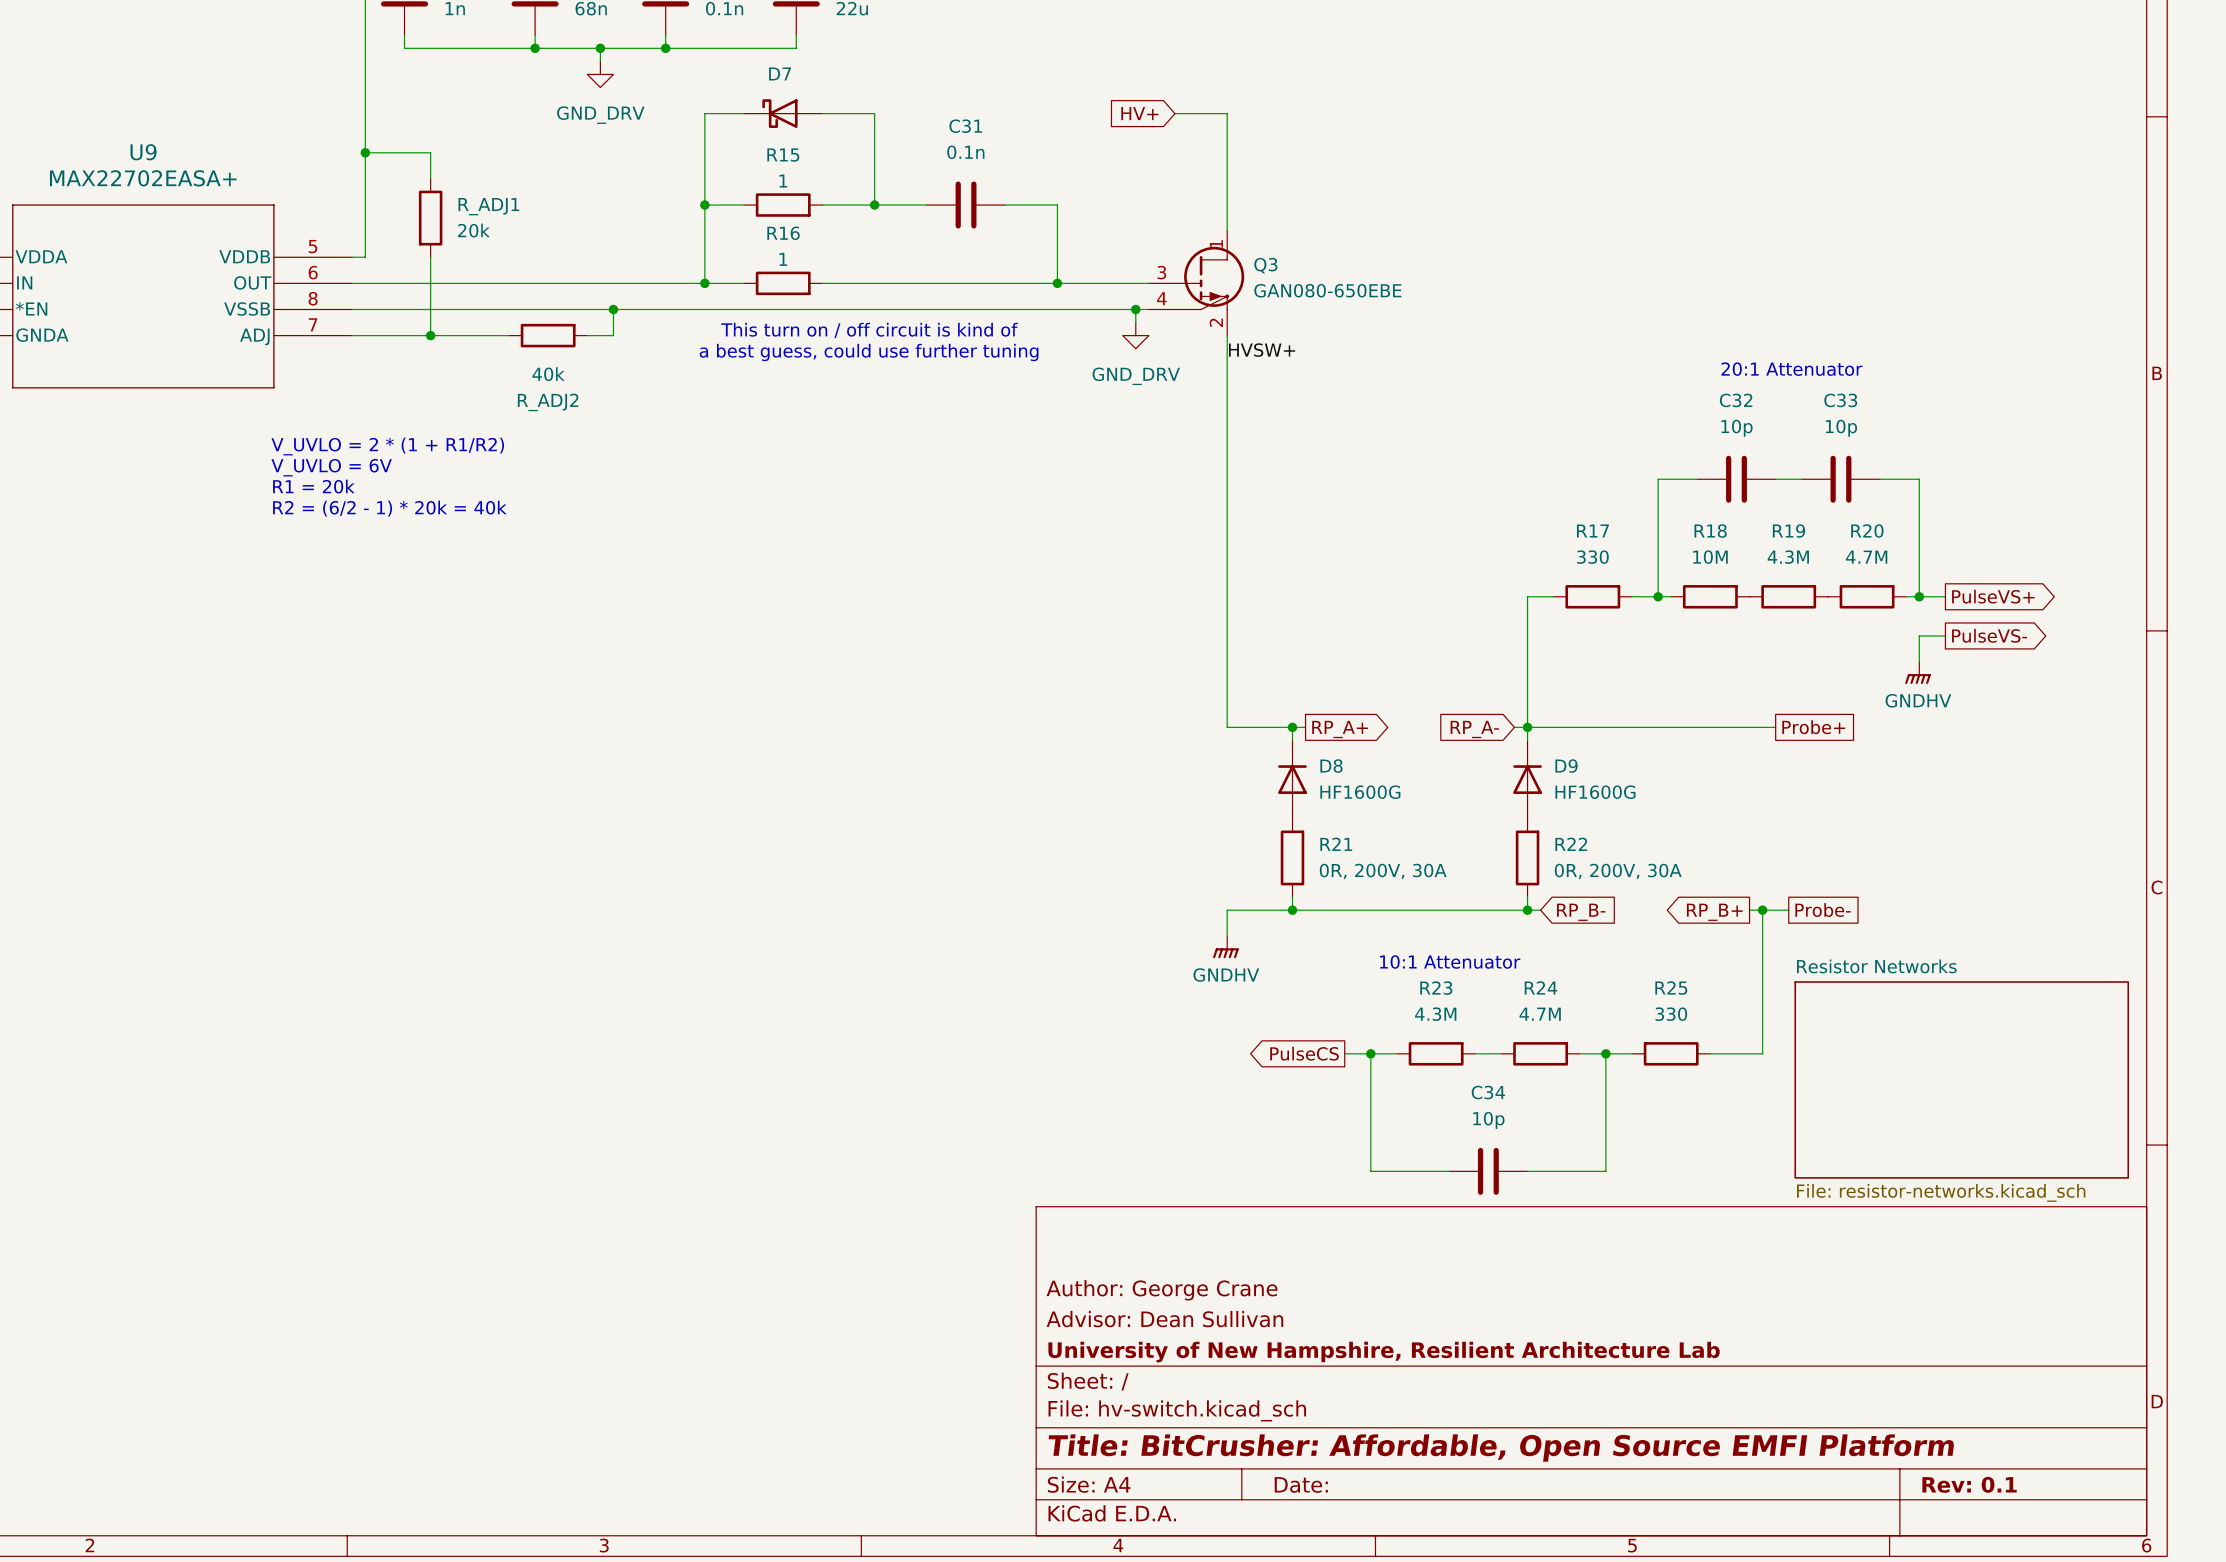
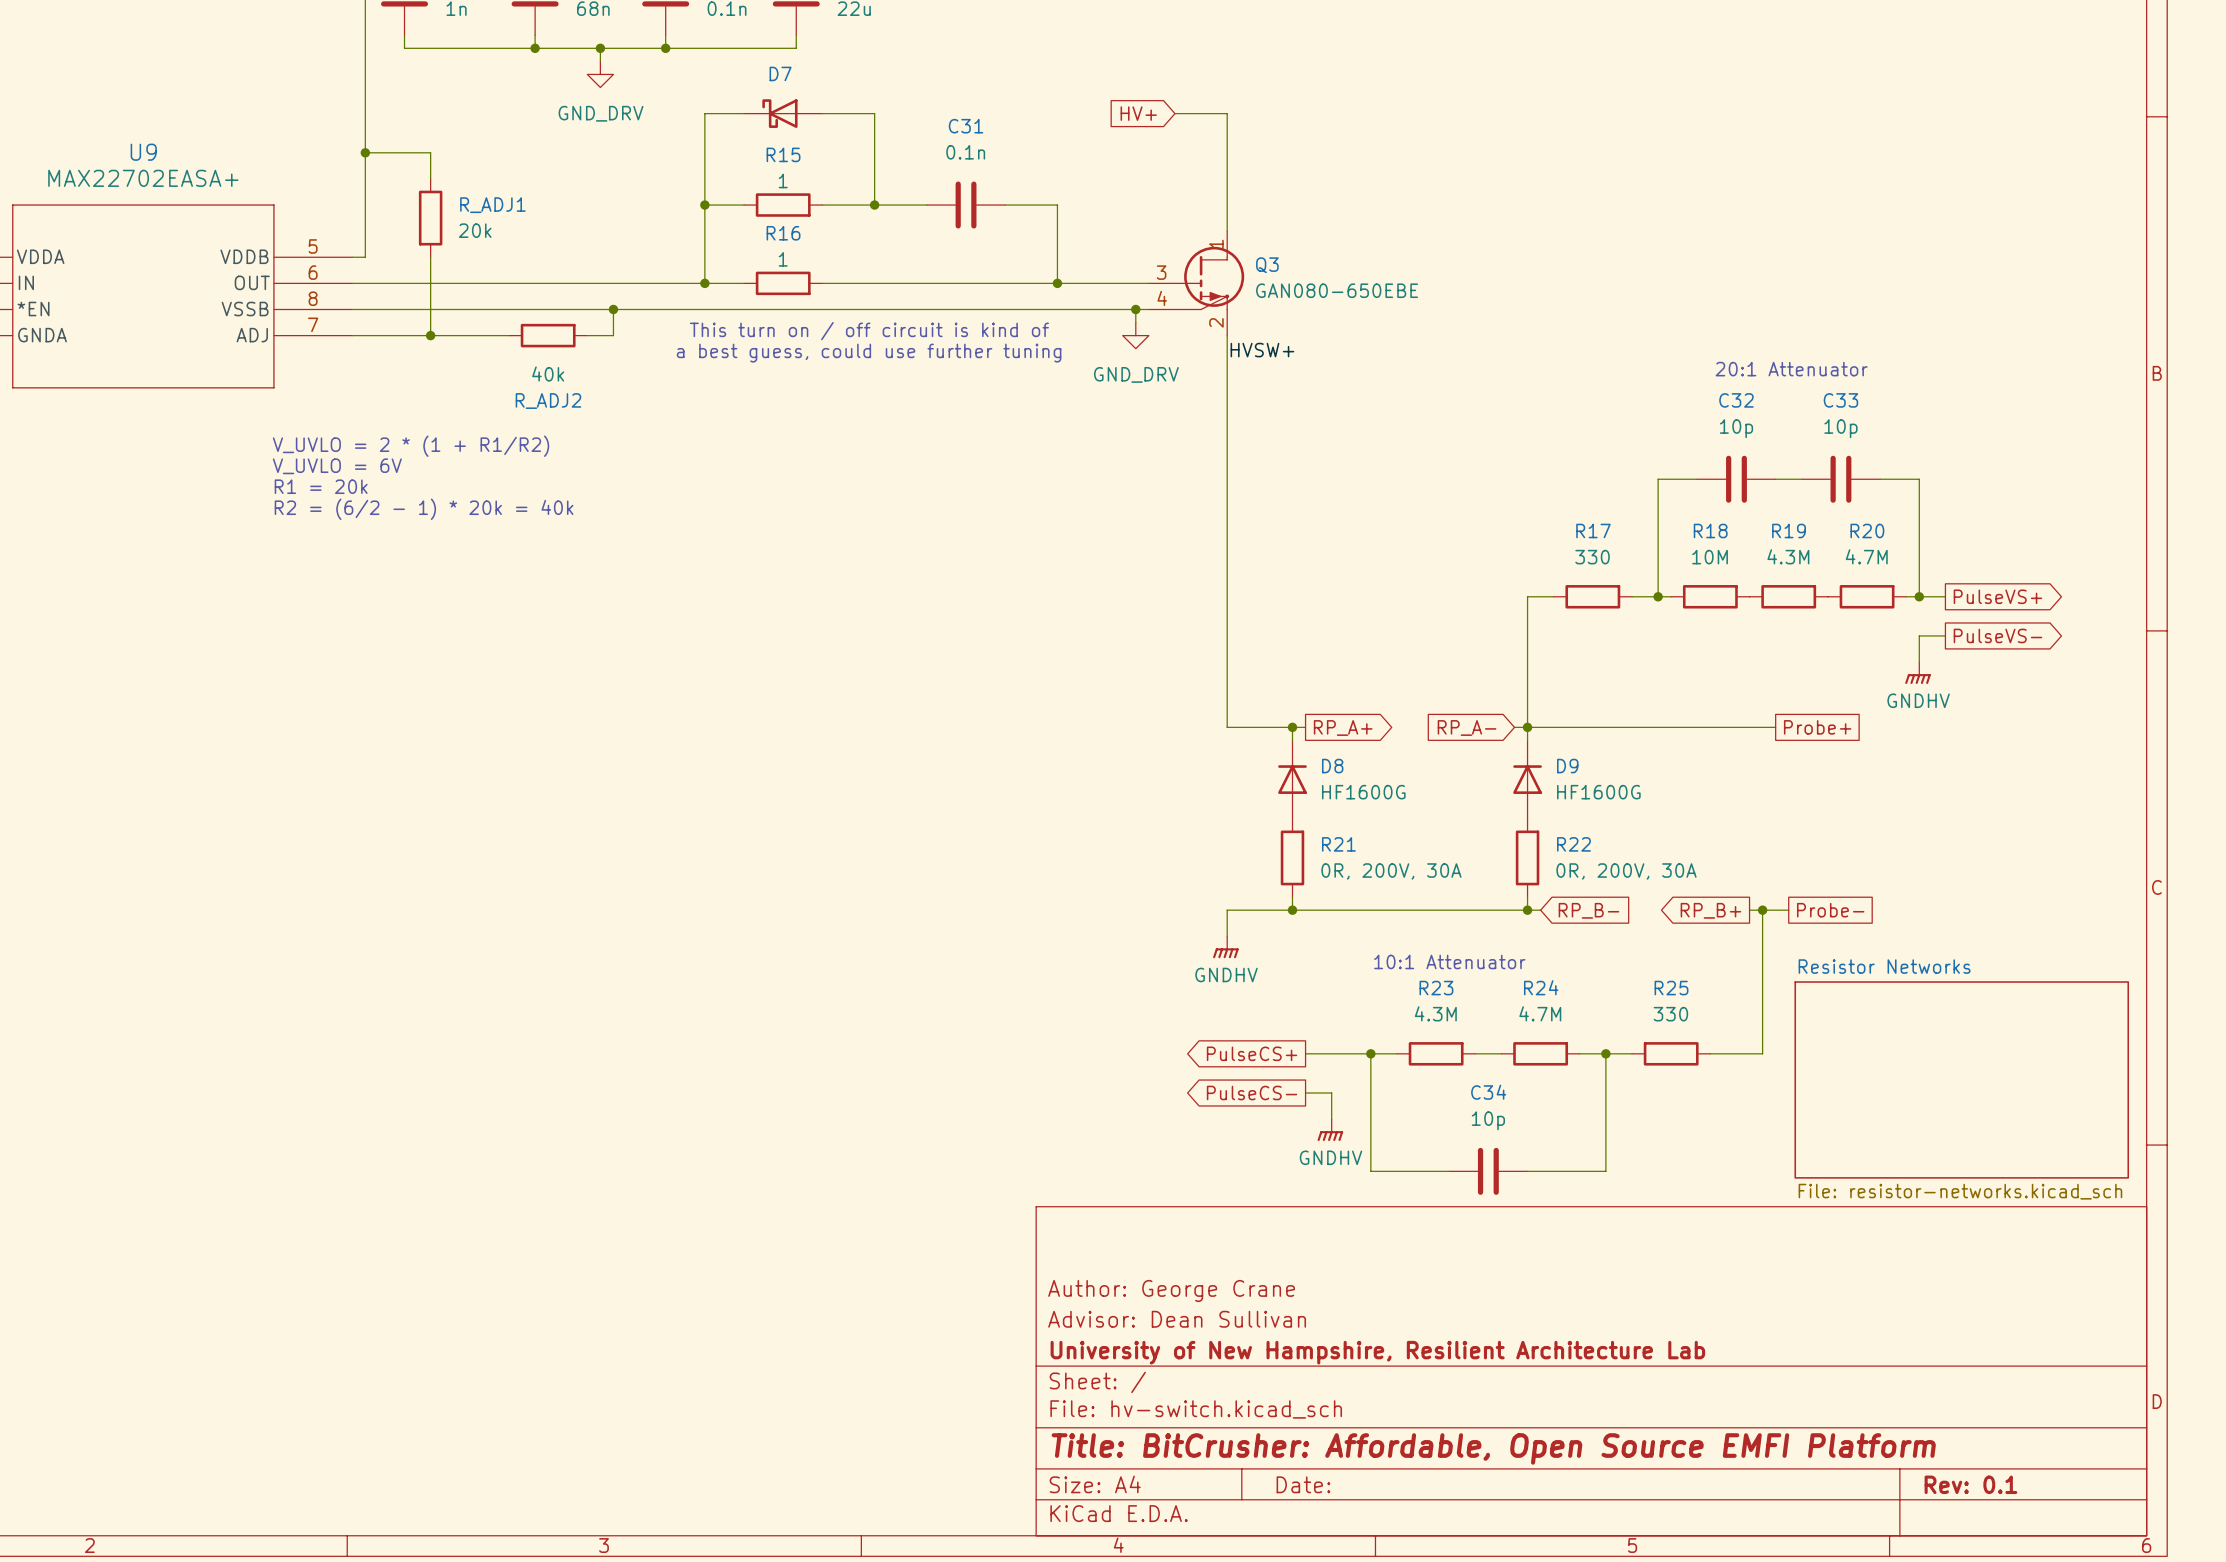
global label: PulseCS (1304, 1053) -> PulseCS+ (1252, 1053)
wire: none -> (1305, 1053) (1344, 1053)
global label: none -> PulseCS- (1252, 1093)
wire: none -> (1305, 1093) (1331, 1093) (1331, 1119)
power symbol: none -> GNDHV (1330, 1130)

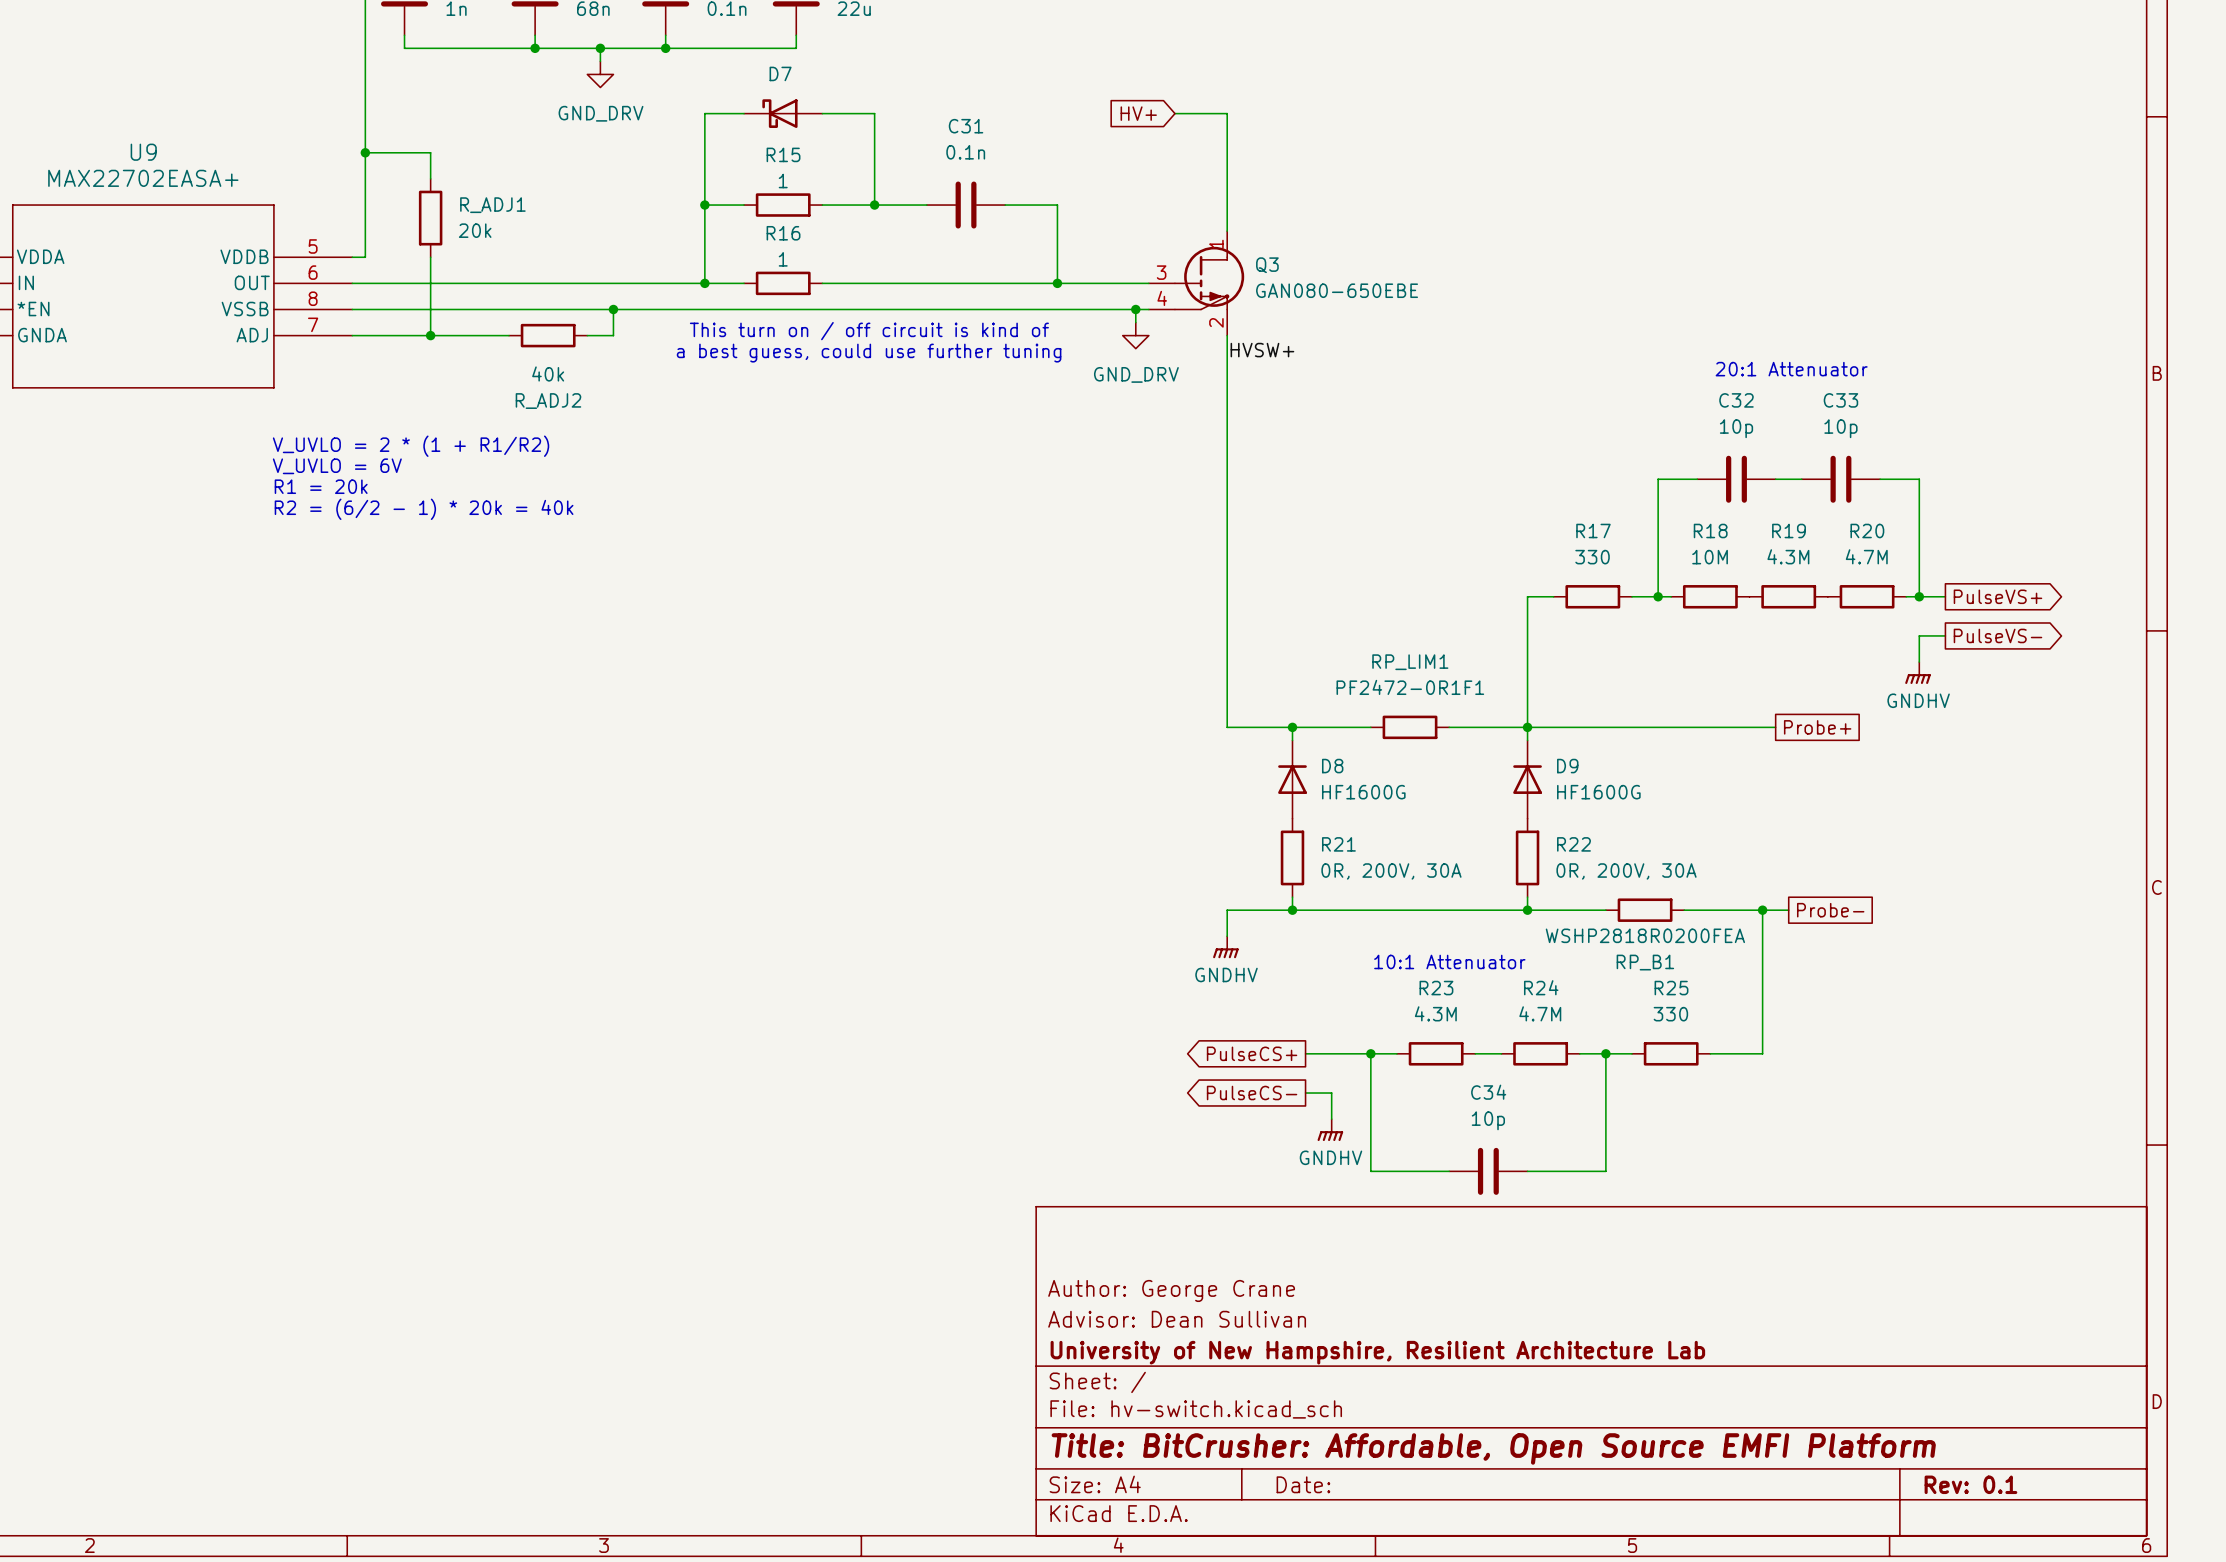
wire: none -> (1305, 727) (1370, 727)
global label: RP_A+ (1343, 727) -> none
RP_LIM1: none -> PF2472-0R1F1 (1410, 727)
wire: none -> (1449, 727) (1514, 727)
global label: RP_A- (1467, 727) -> none
wire: none -> (1540, 910) (1605, 910)
global label: RP_B- (1588, 910) -> none
RP_B1: none -> WSHP2818R0200FEA (1645, 910)
wire: none -> (1684, 910) (1749, 910)
global label: RP_B+ (1710, 910) -> none
sheet Resistor Networks: File: resistor-networks.kicad_sch (1961, 1079) -> none

